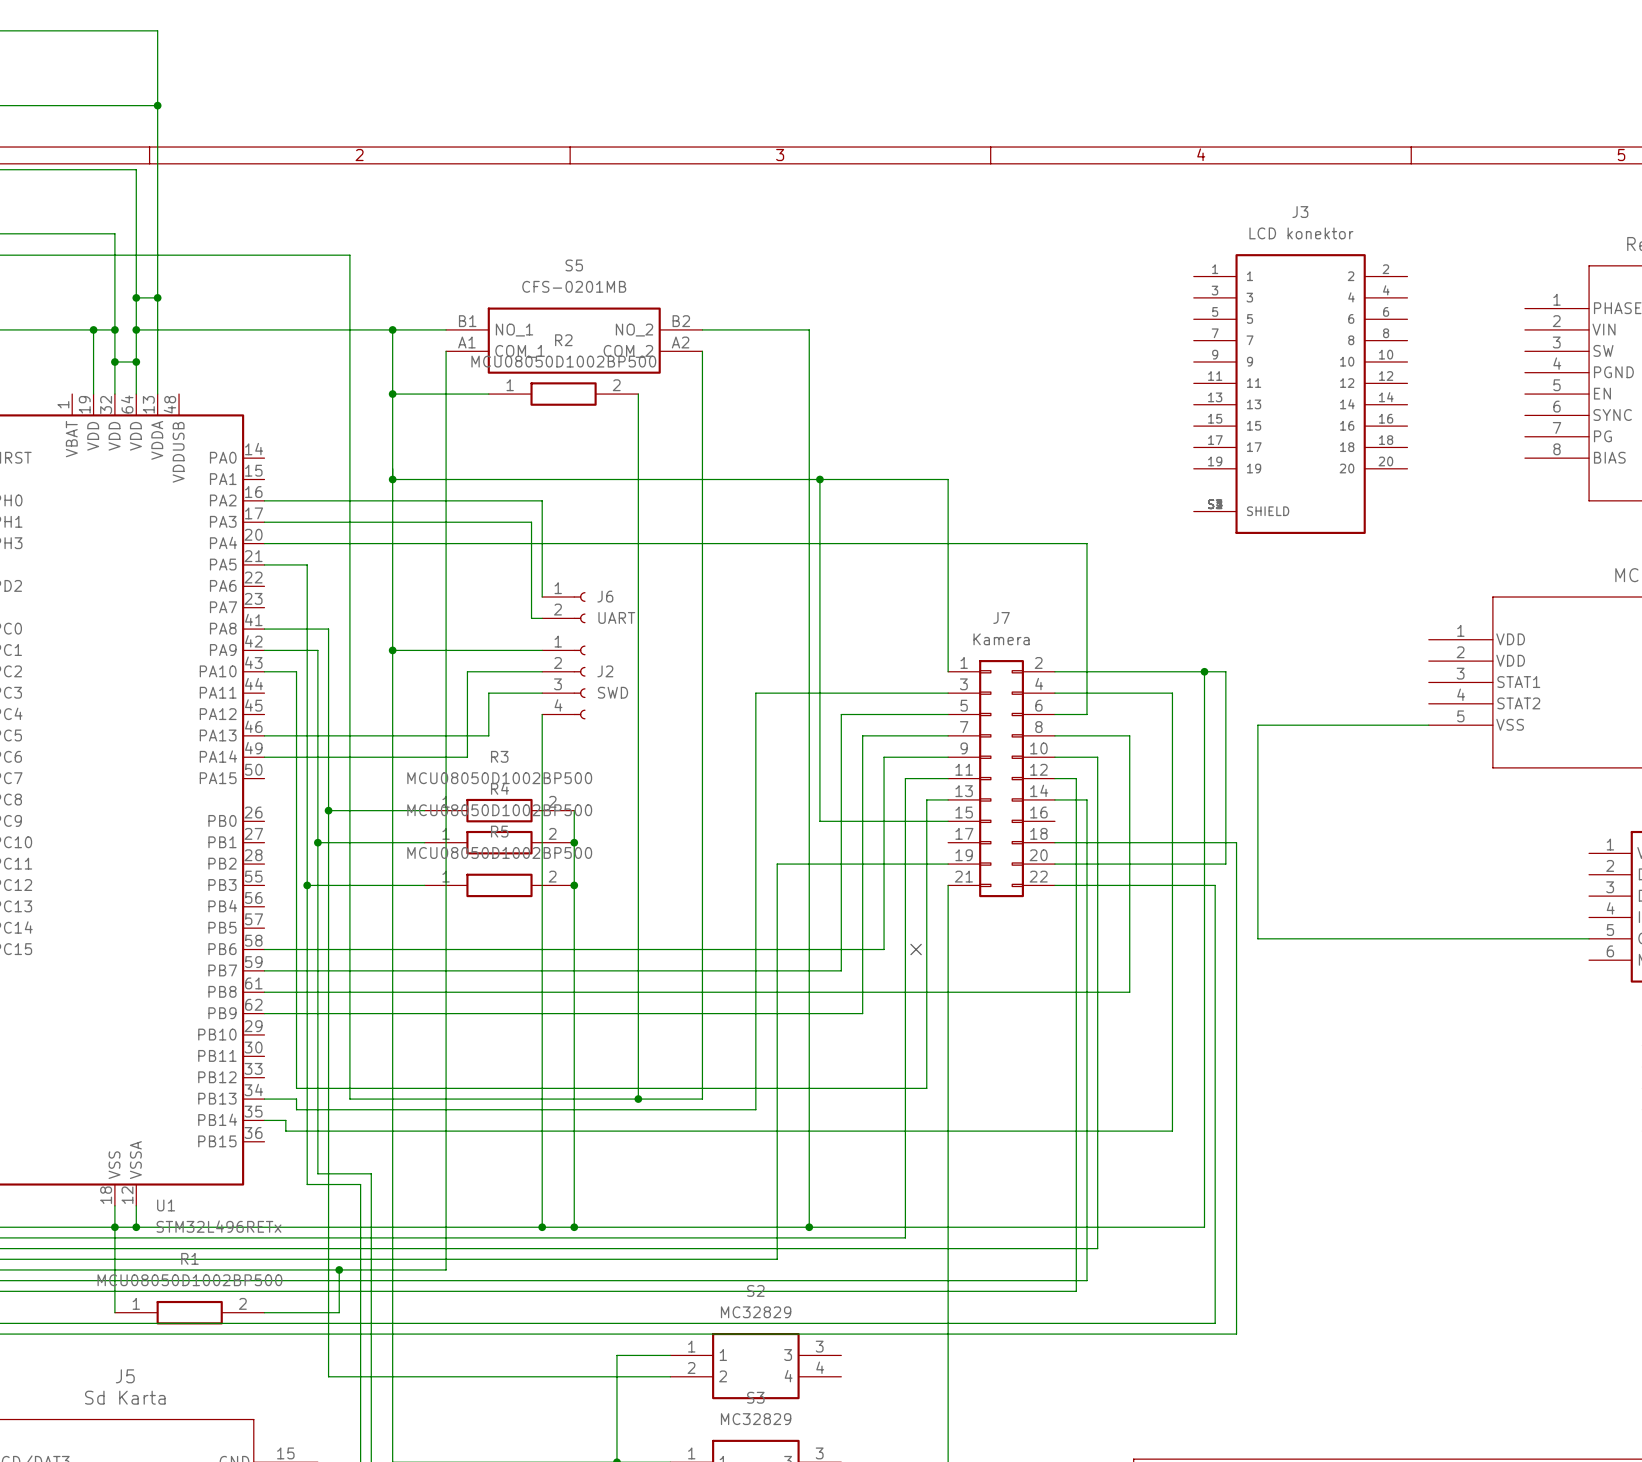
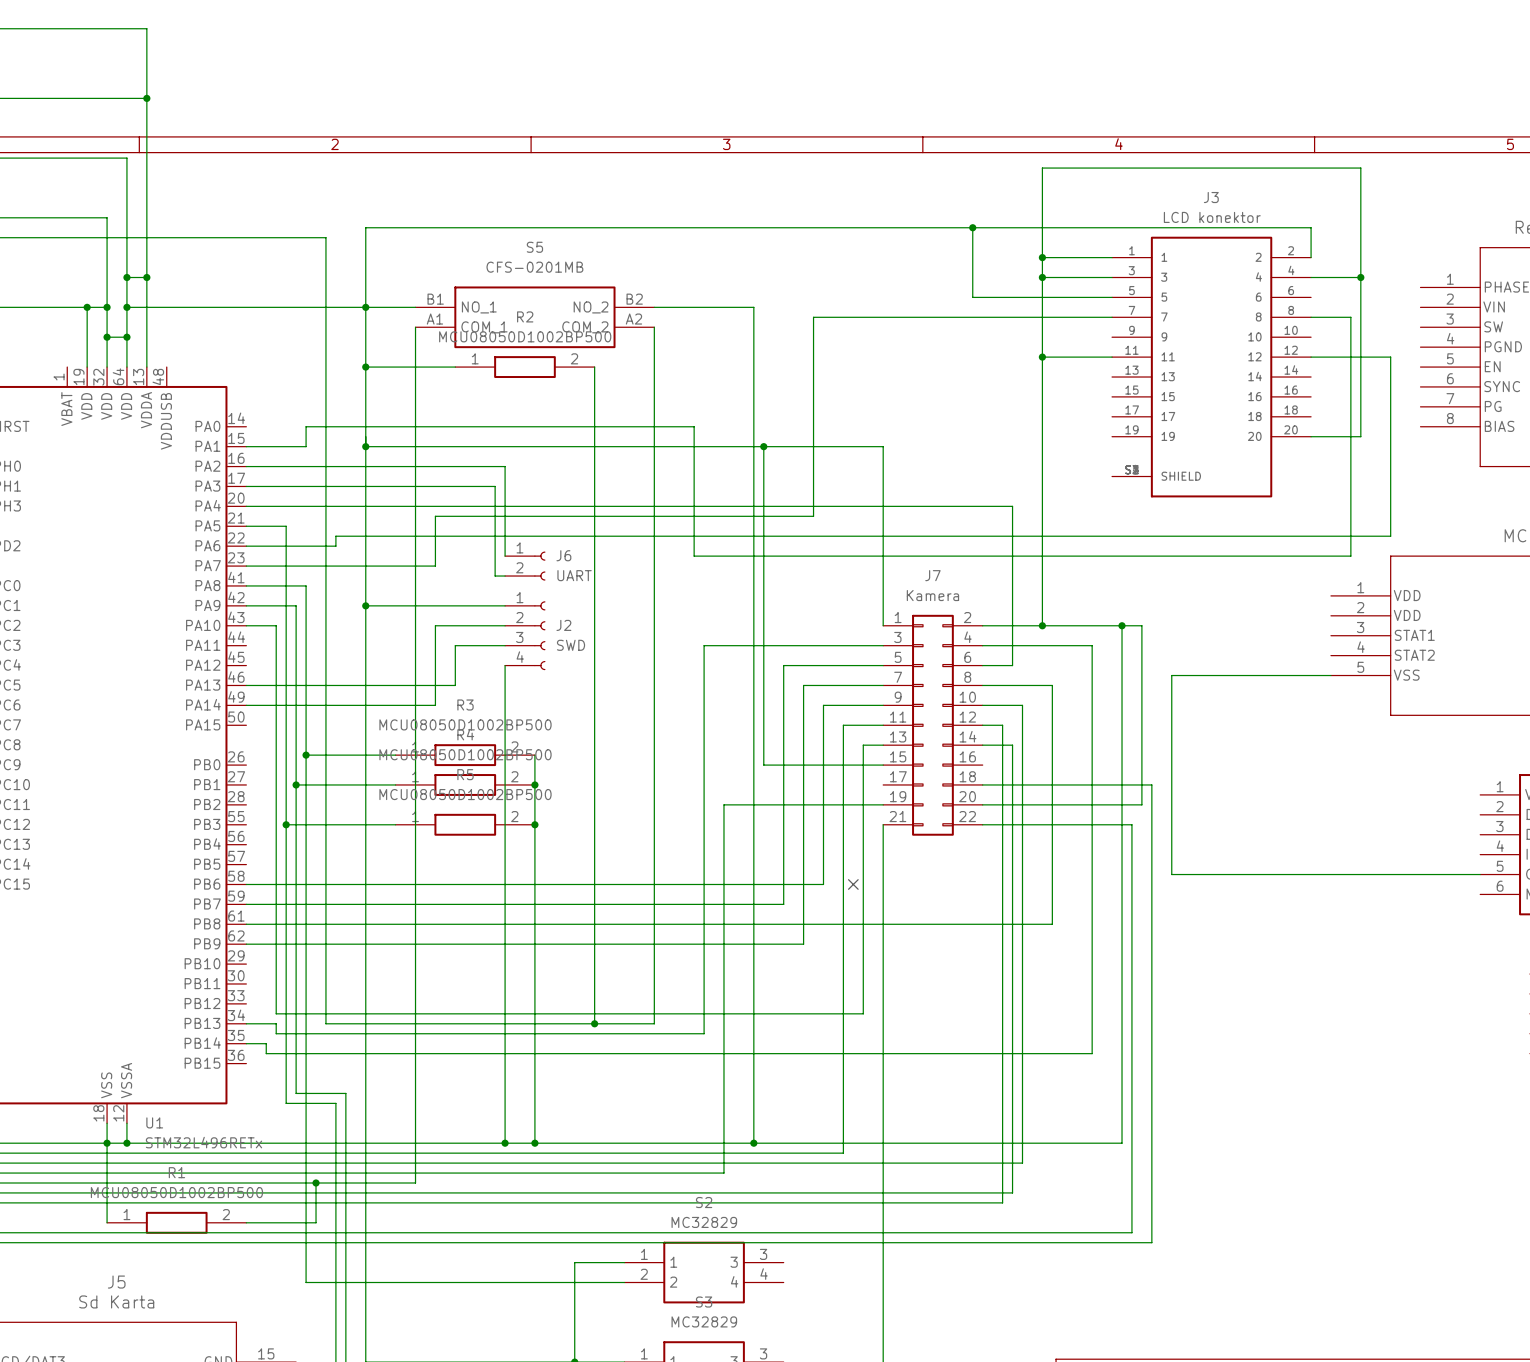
wire: none -> (972, 227) (972, 297) (1112, 297)
junction: none -> (972, 227)
wire: none -> (1042, 257) (1112, 257)
junction: none -> (1042, 257)
wire: none -> (1311, 257) (1311, 227) (365, 227) (365, 307)
wire: none -> (1042, 277) (1112, 277)
junction: none -> (1042, 277)
wire: none -> (1311, 277) (1360, 277)
junction: none -> (1360, 277)
wire: none -> (1112, 317) (813, 317) (813, 516) (435, 516) (435, 566) (246, 566)
wire: none -> (1311, 317) (1350, 317) (1350, 556) (694, 556) (694, 426) (306, 426) (306, 446) (246, 446)
wire: none -> (1042, 357) (1112, 357)
junction: none -> (1042, 357)
wire: none -> (1311, 357) (1390, 357) (1390, 536) (335, 536) (335, 546) (246, 546)
wire: none -> (1311, 436) (1360, 436) (1360, 168) (1042, 168) (1042, 625)
junction: none -> (1042, 625)

